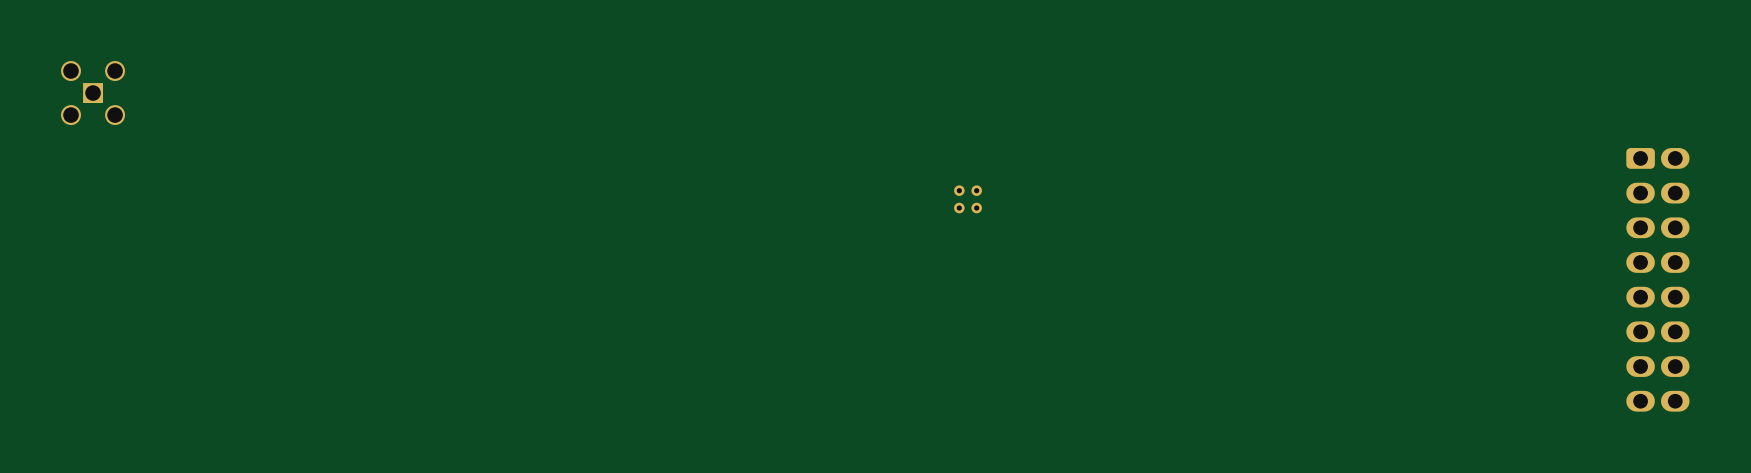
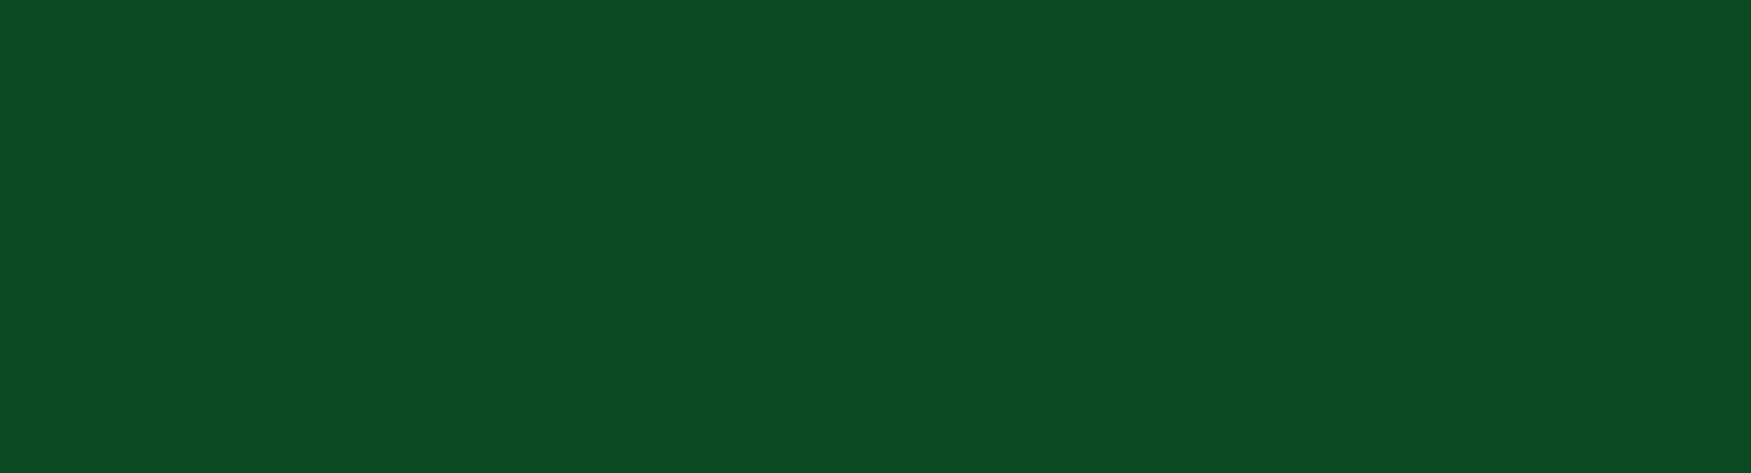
part: (93, 93) -> none
part: (968, 199) -> none
part: (1657, 279) -> none

